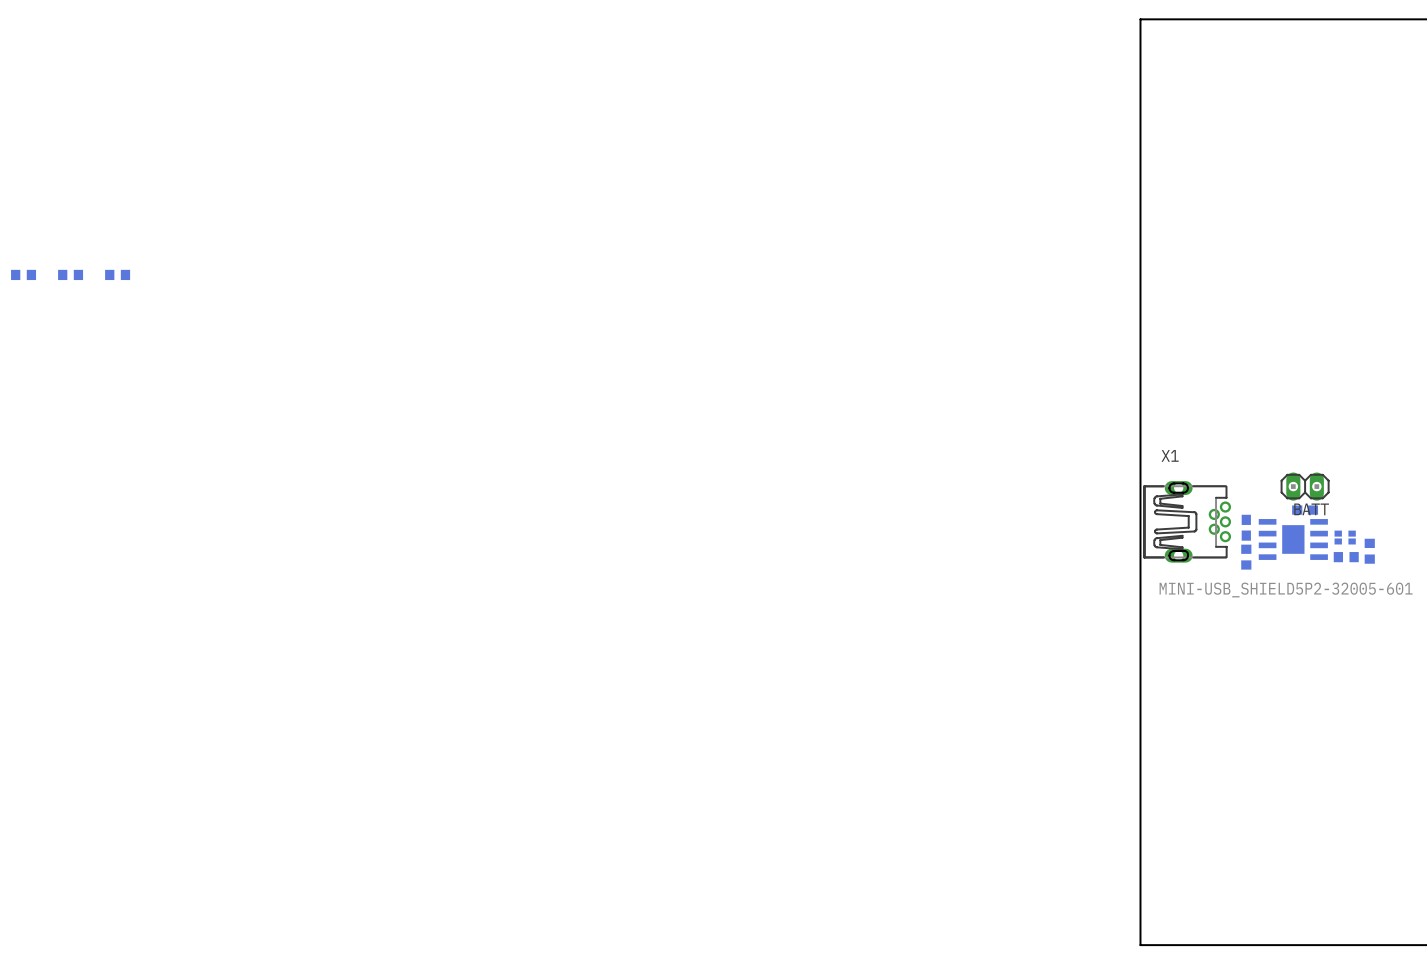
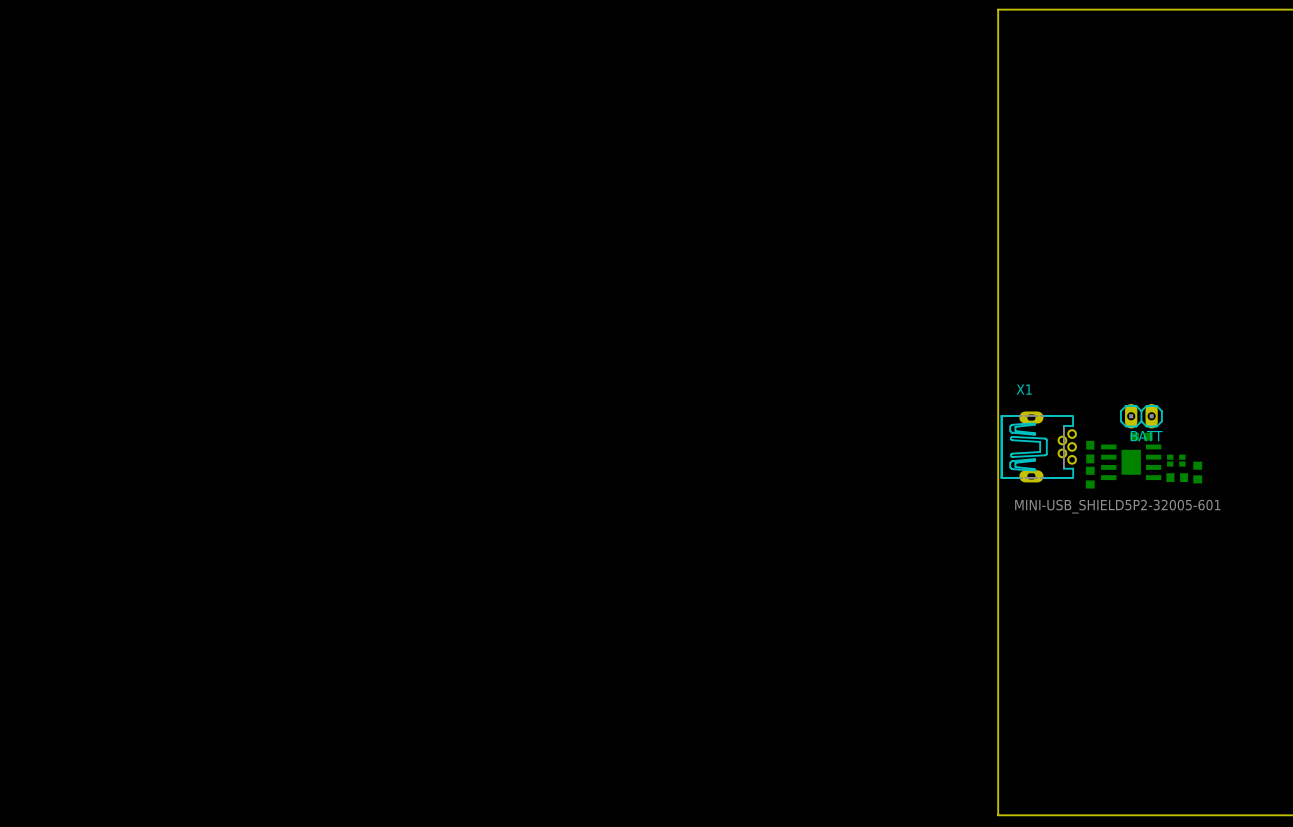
part: (23, 274) -> none
part: (70, 274) -> none
part: (117, 274) -> none

